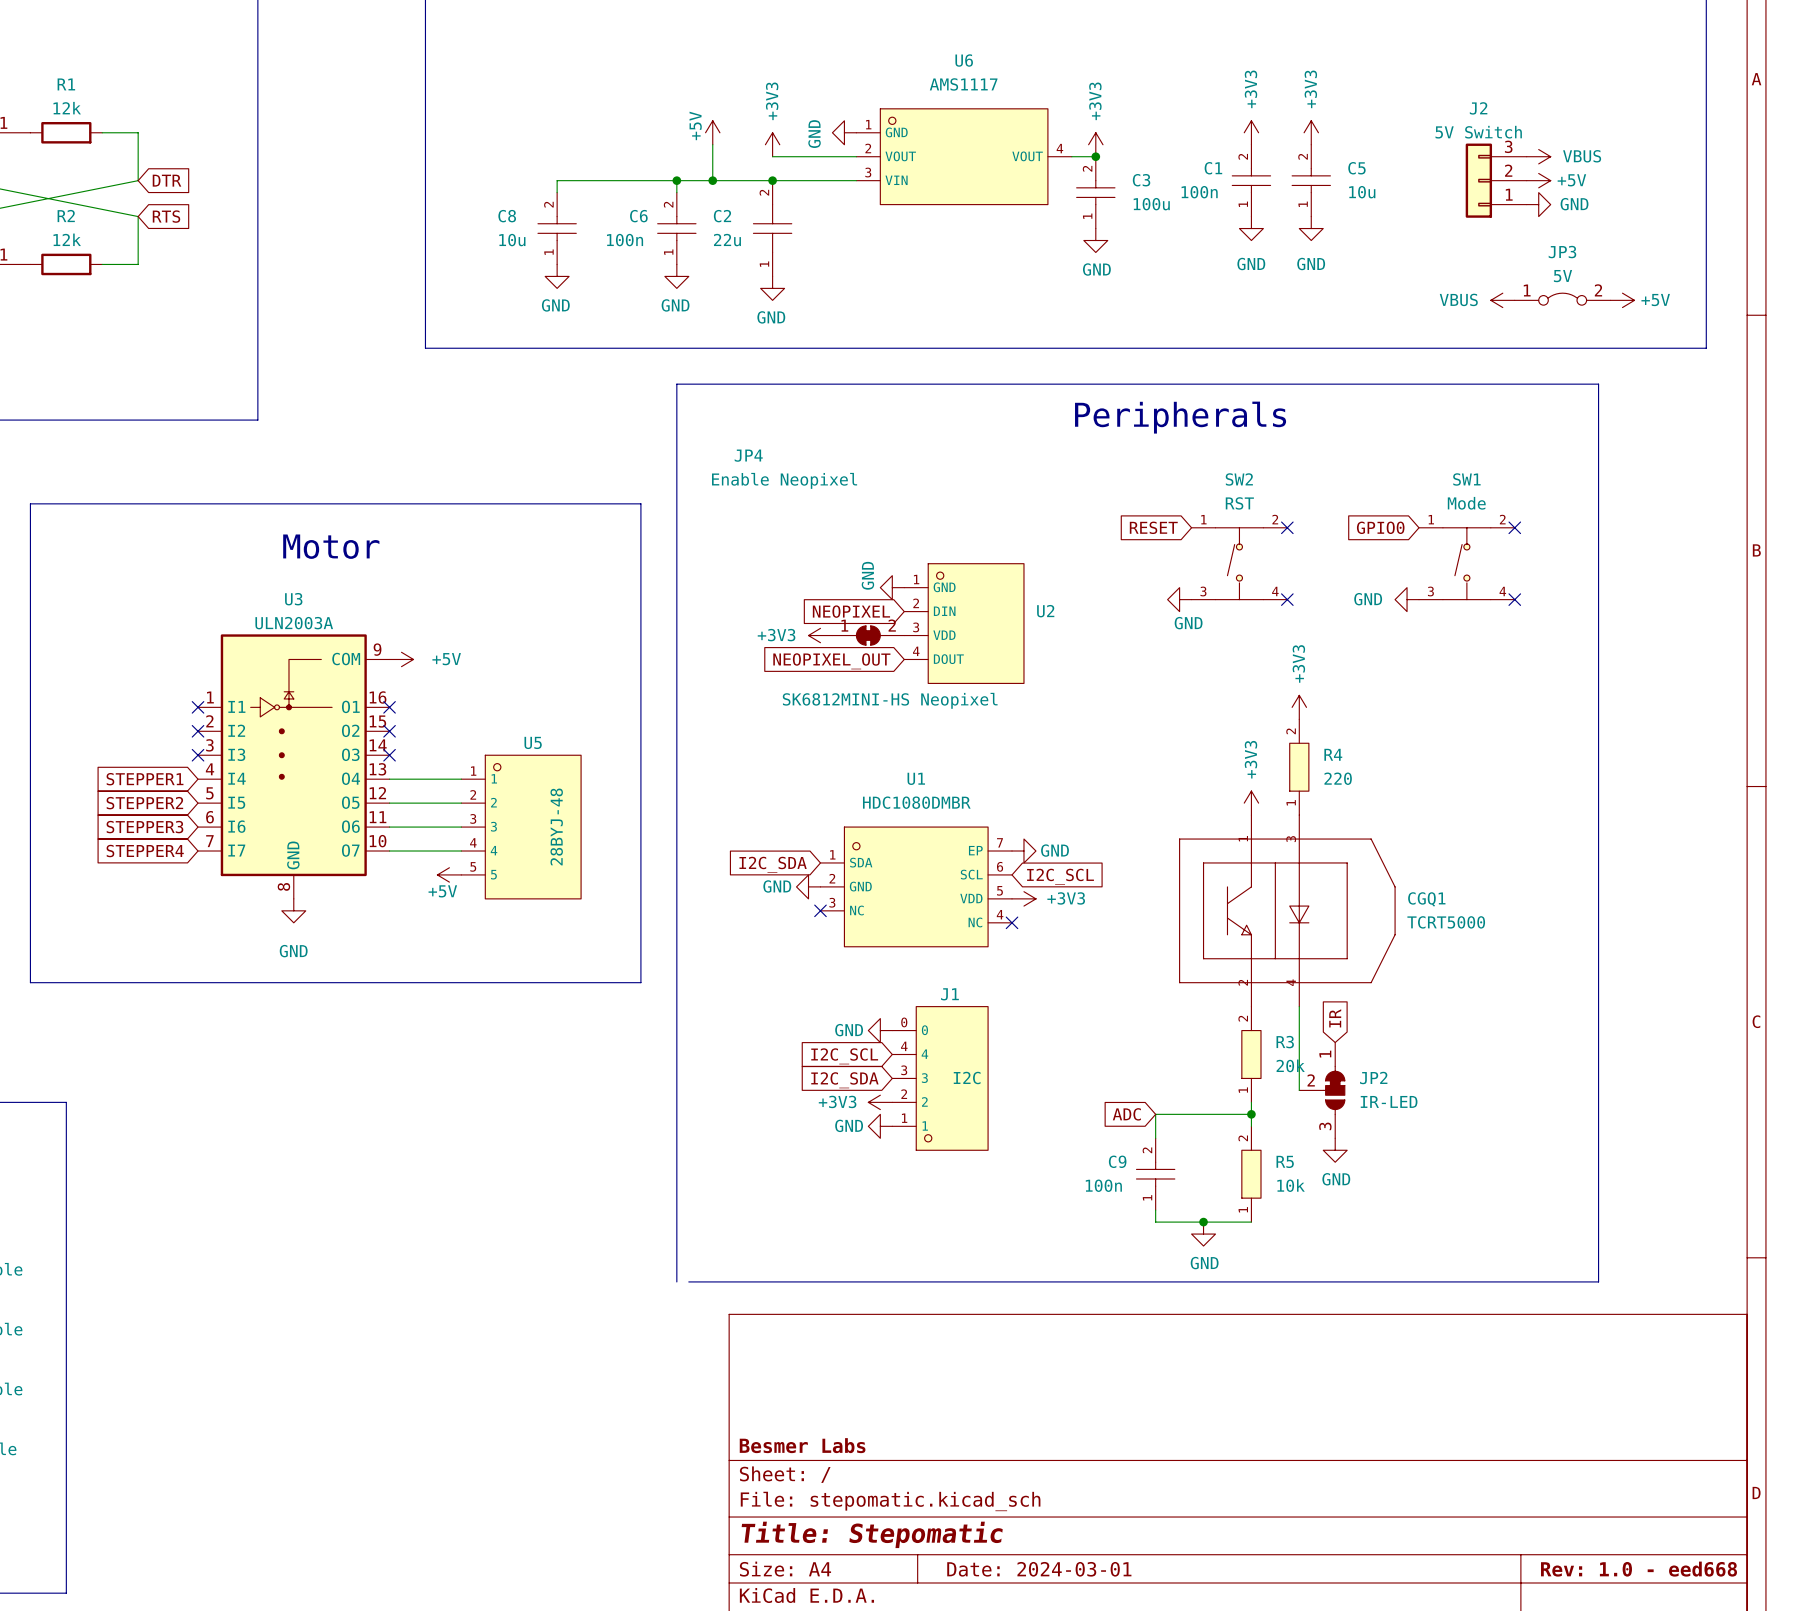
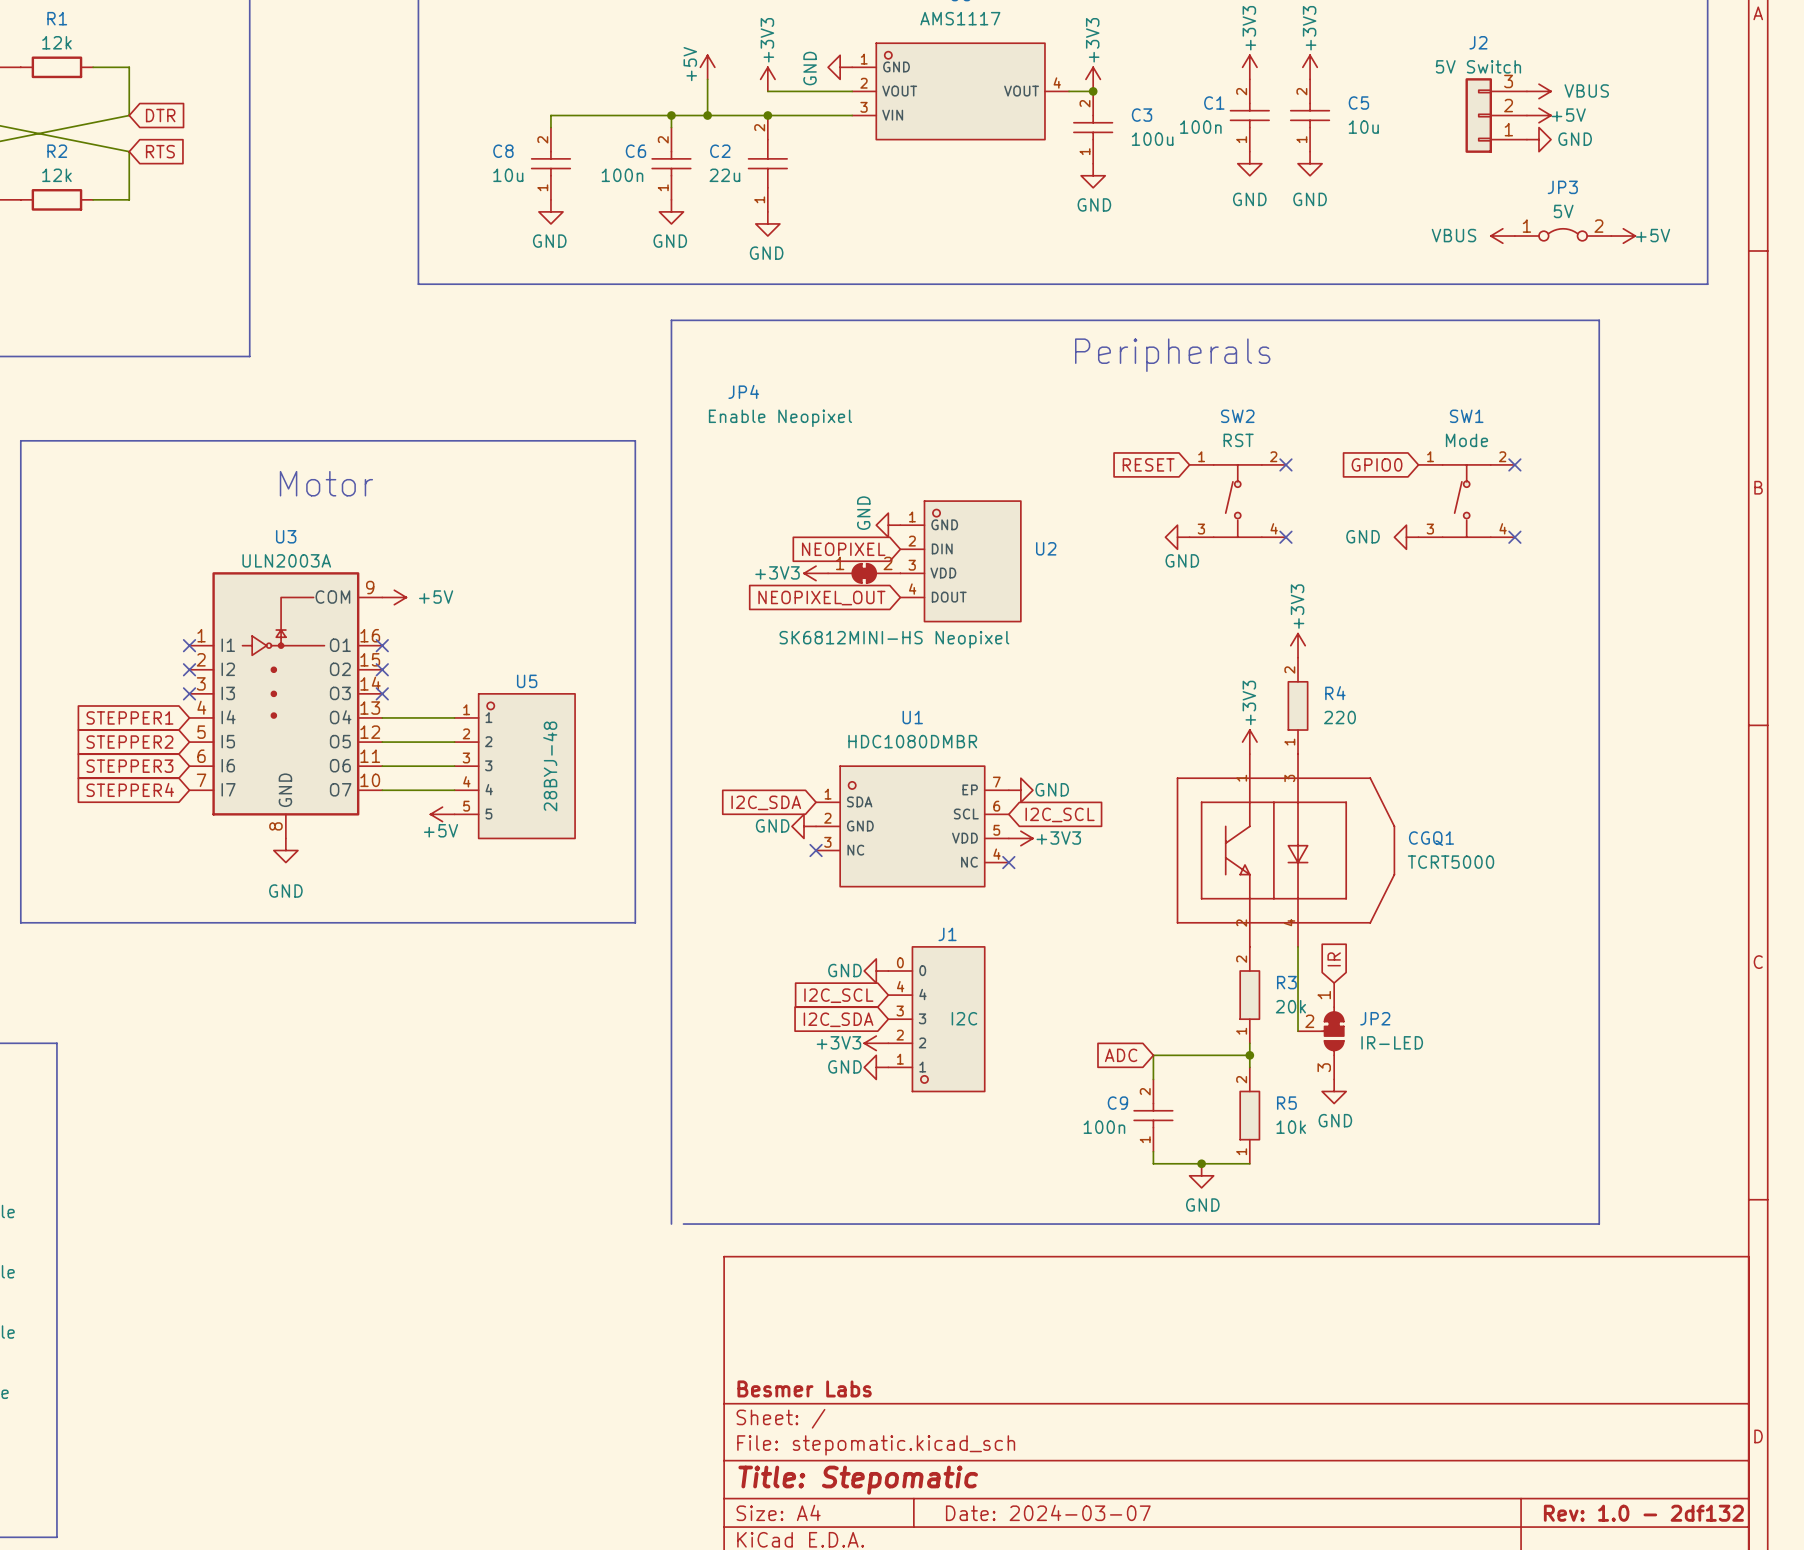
title block: Date: 2024-03-01 (1039, 1569) -> Date: 2024-03-07 (1048, 1512)
title block: Rev: 1.0 - eed668 (1639, 1569) -> Rev: 1.0 - 2df132 (1643, 1513)

